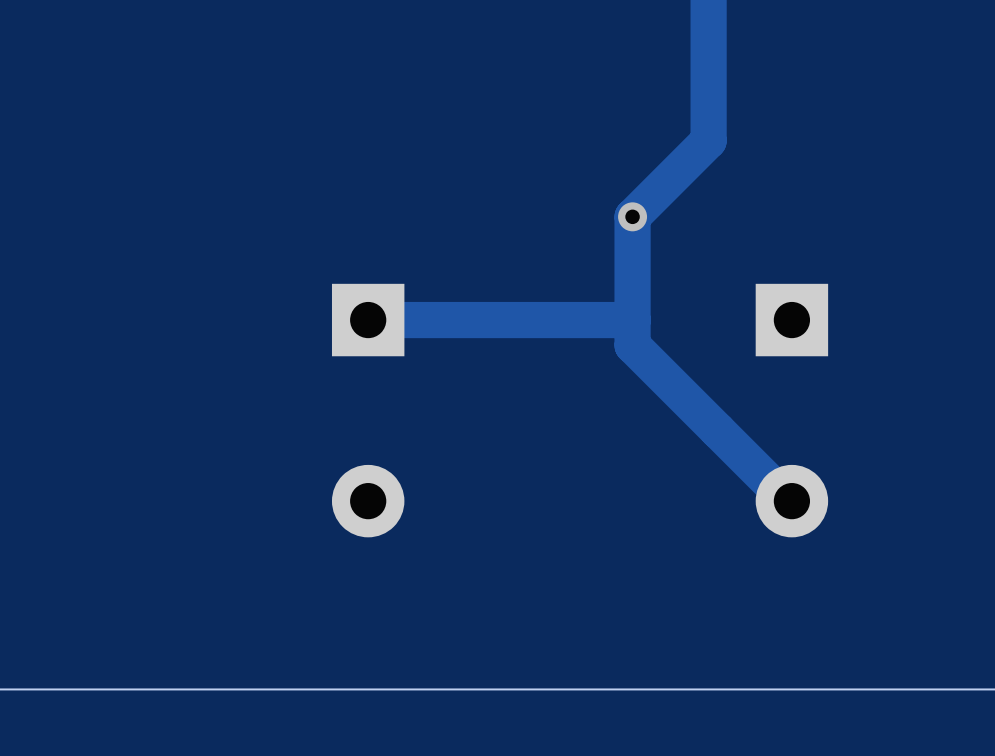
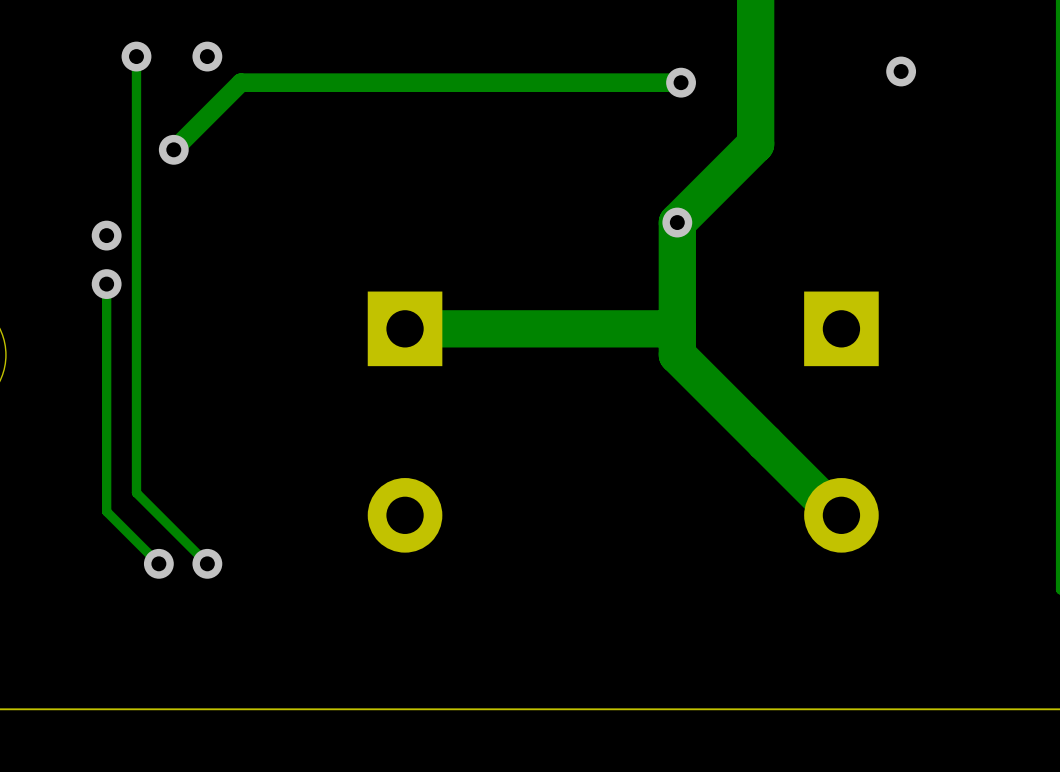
track: none -> (136, 56) (136, 492) (207, 563)
via: none -> (136, 56)
via: none -> (207, 56)
via: none -> (901, 71)
track: none -> (681, 82) (240, 82) (173, 149)
via: none -> (681, 82)
via: none -> (173, 149)
via: none -> (106, 235)
track: none -> (106, 284) (106, 511) (158, 563)
via: none -> (106, 284)
via: none -> (158, 563)
via: none -> (207, 563)

